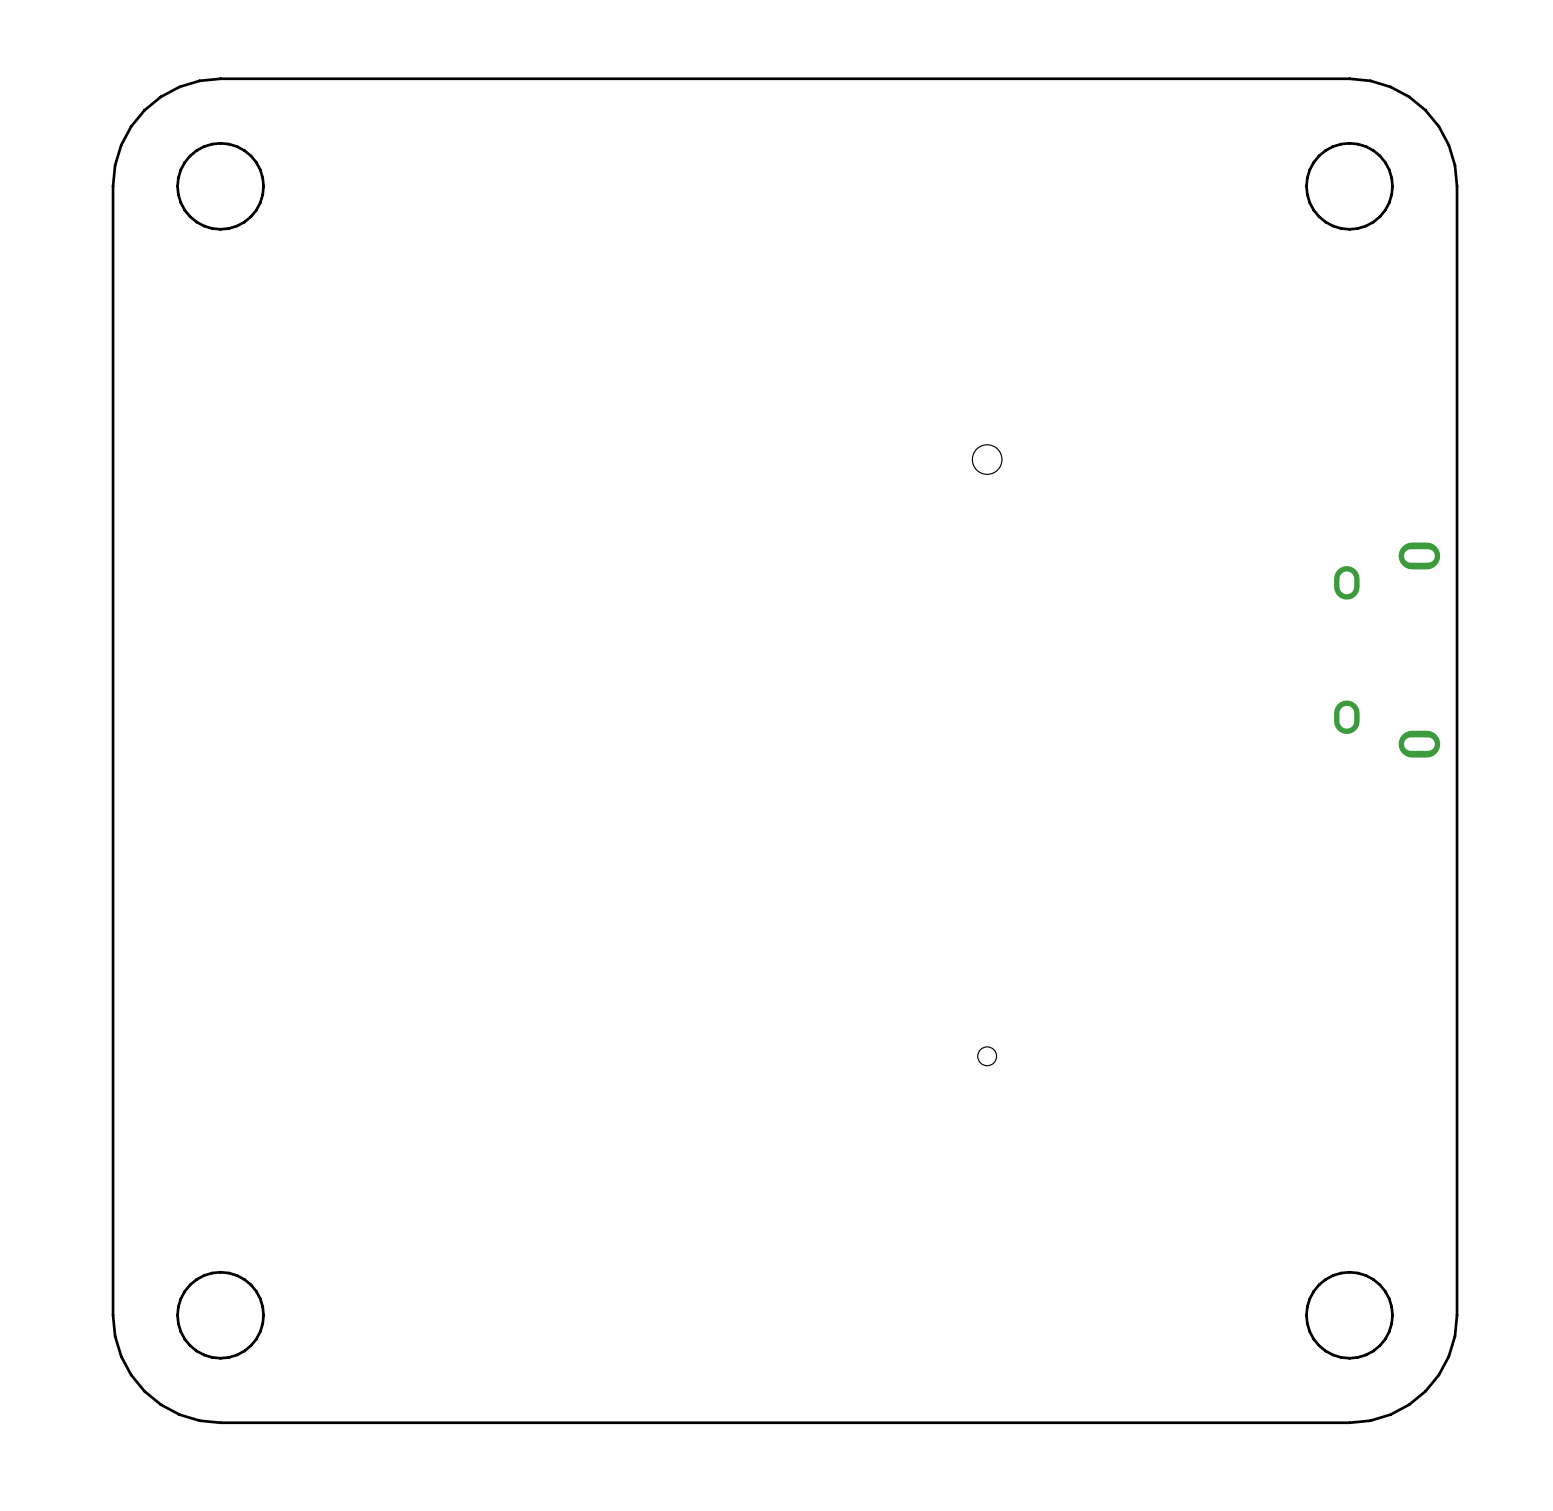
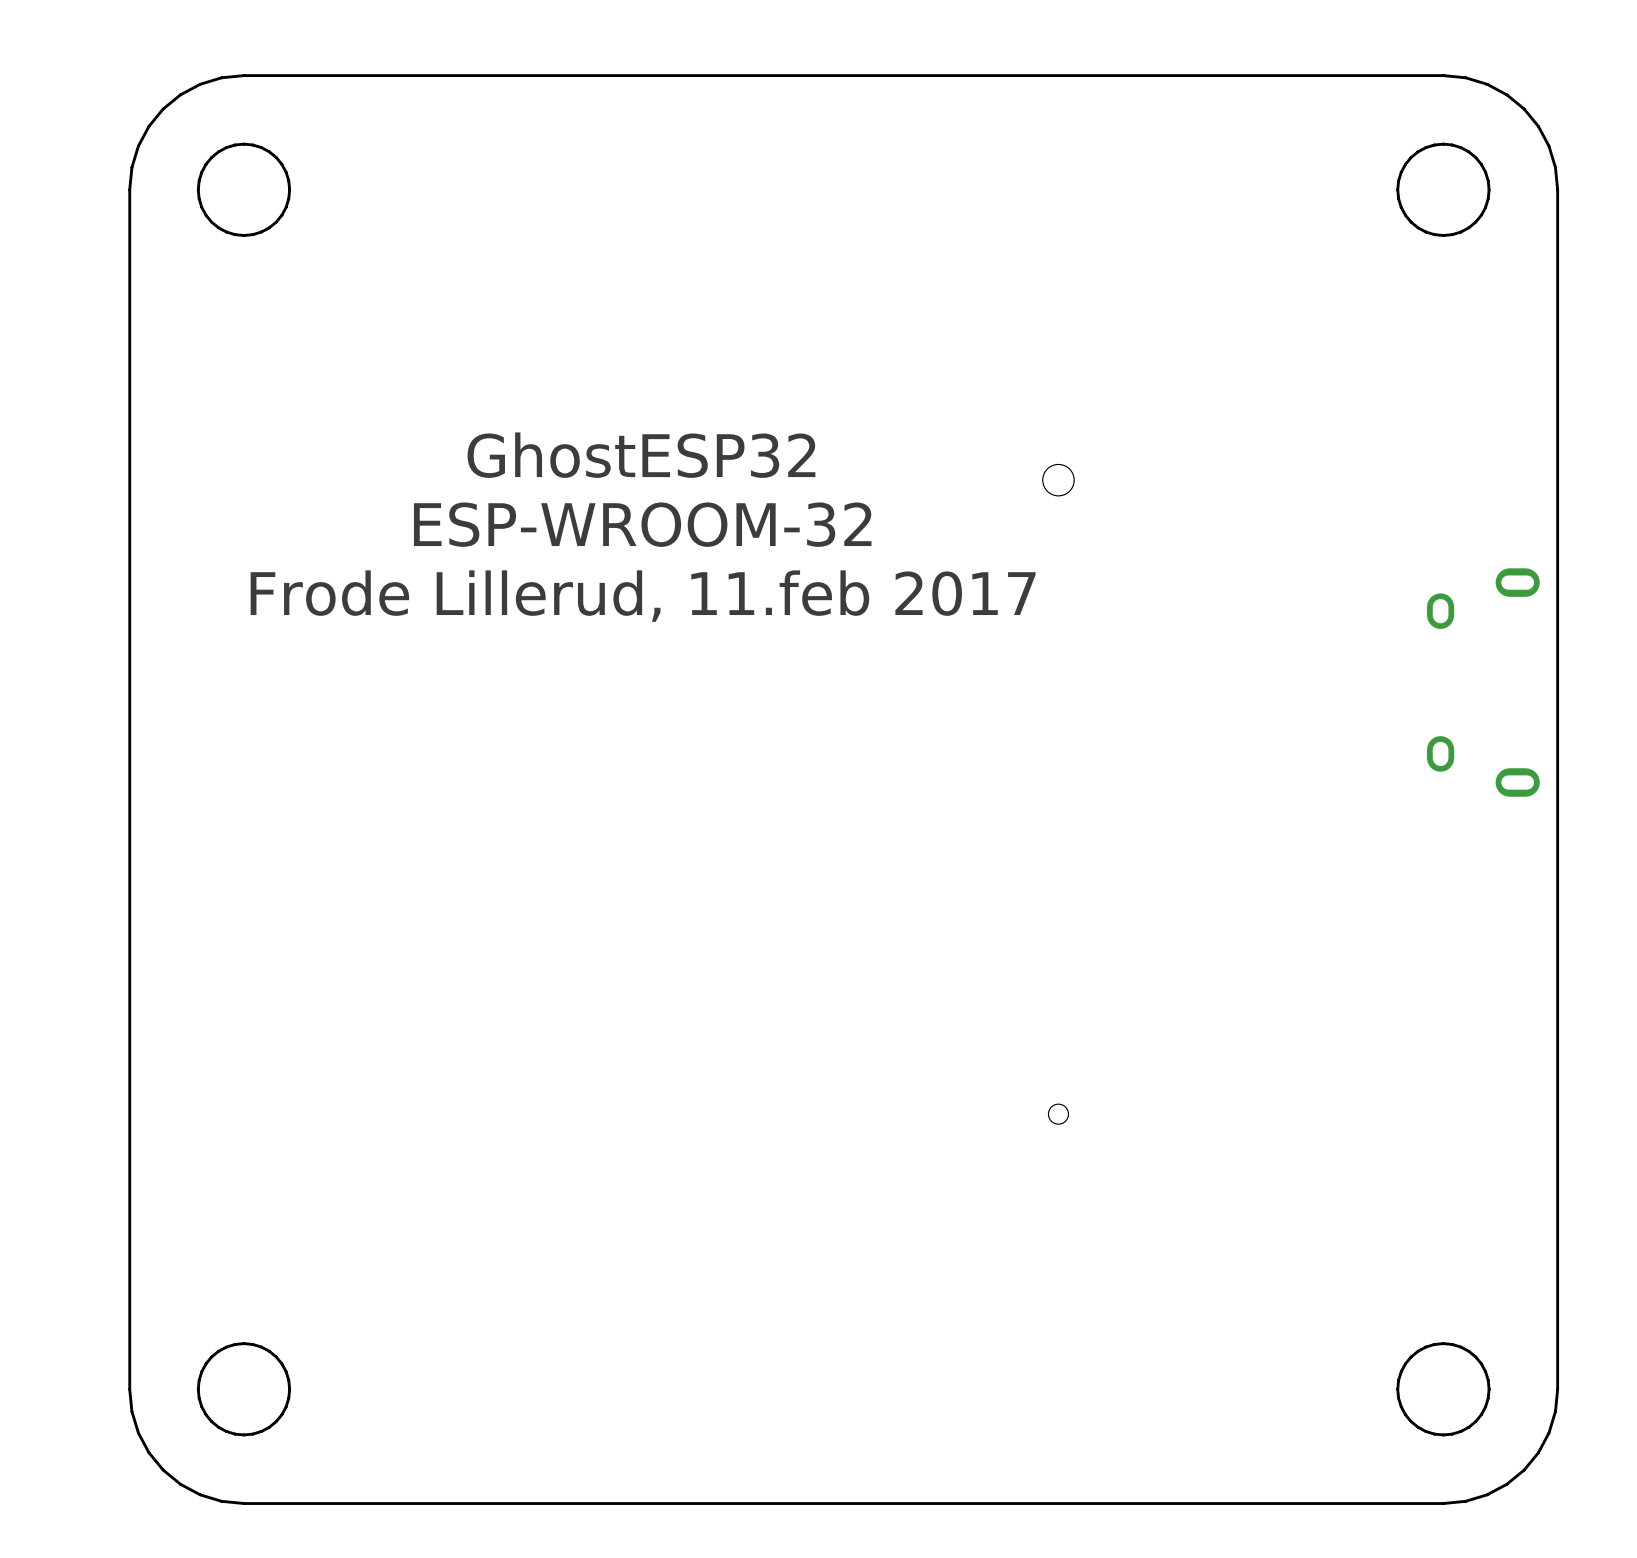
text: none -> GhostESP32 (641, 455)
text: none -> ESP-WROOM-32 (642, 524)
text: none -> Frode Lillerud, 11.feb 2017 (643, 596)

